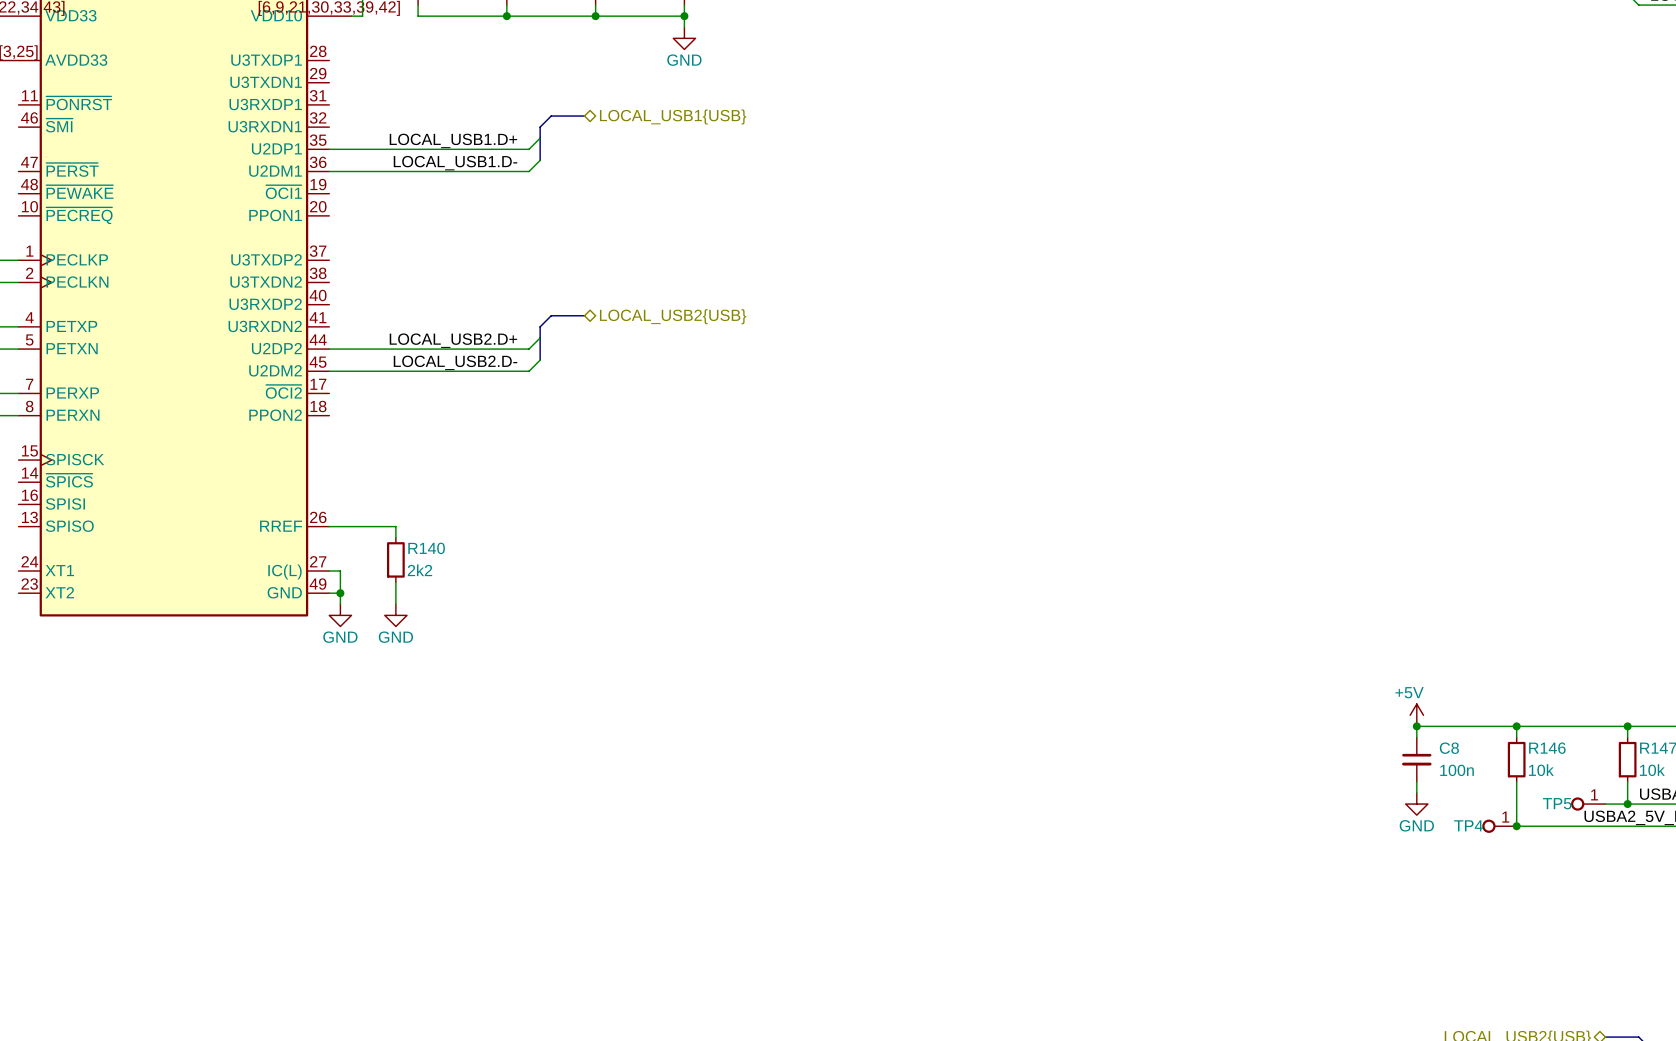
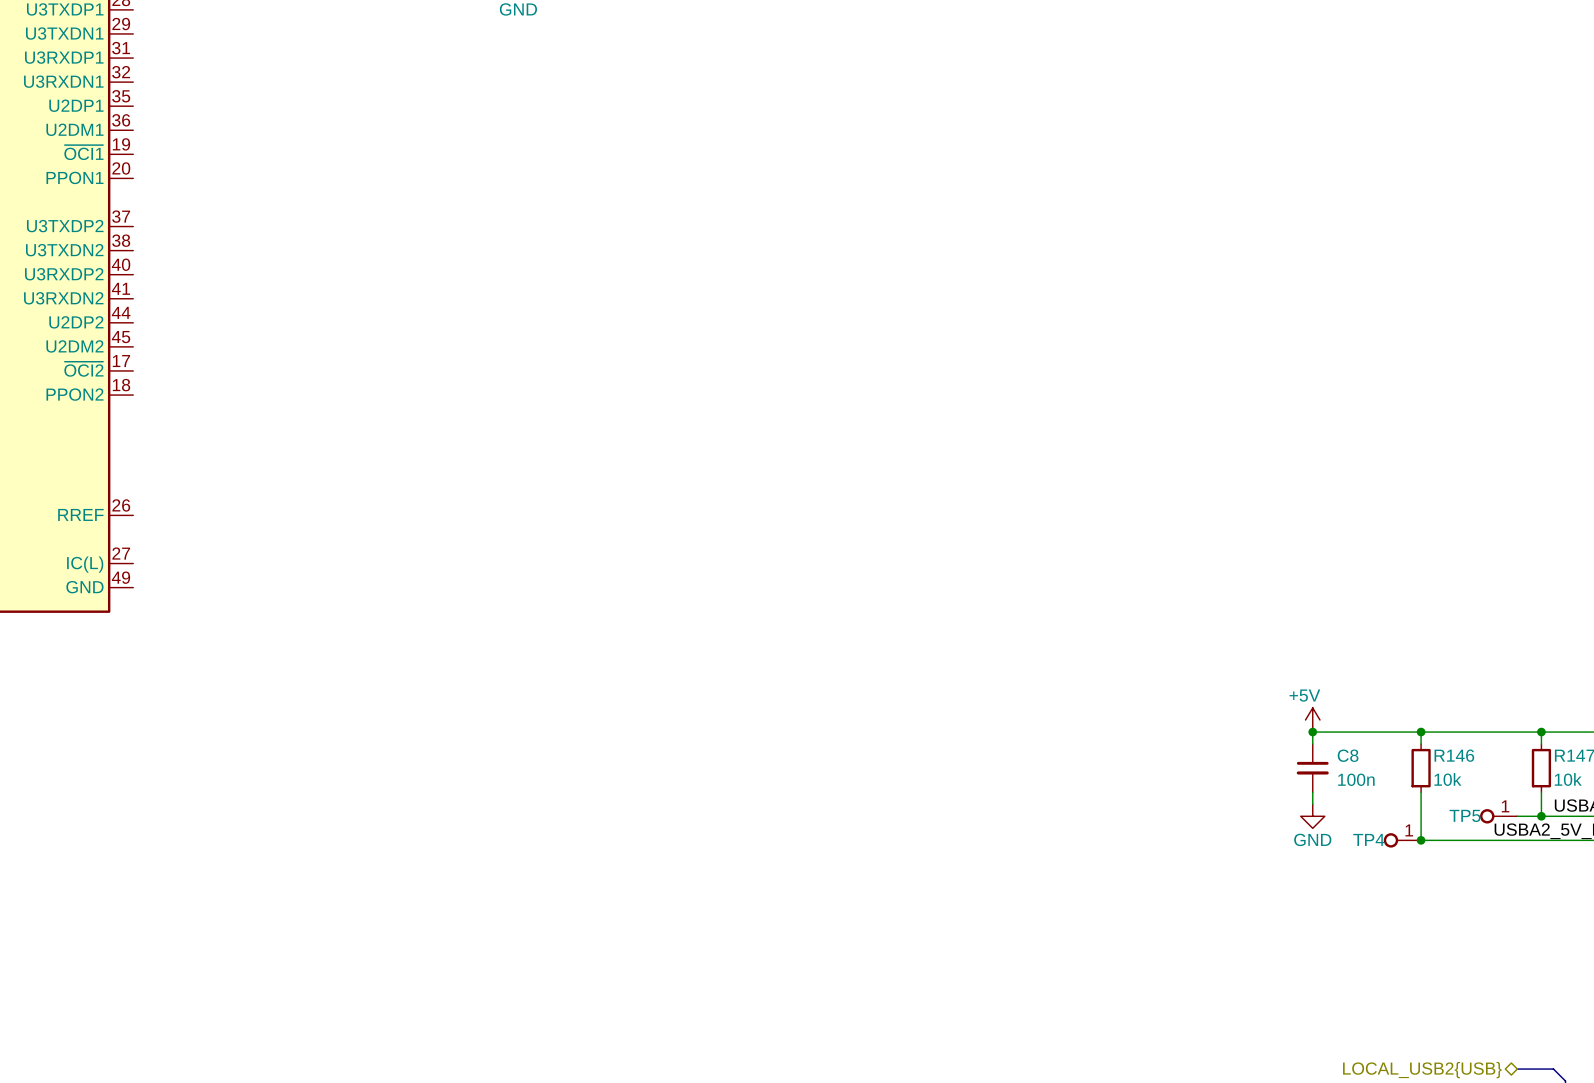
bus: (584, 116) (551, 116) (540, 127) (540, 160) -> none
hierarchical label: LOCAL_USB1{USB} (673, 116) -> none
wire: (540, 138) (529, 149) (329, 149) -> none
label: LOCAL_USB1.D+ (453, 140) -> none
wire: (540, 160) (529, 171) (329, 171) -> none
label: LOCAL_USB1.D- (455, 163) -> none
bus: (584, 315) (551, 315) (540, 326) (540, 360) -> none
hierarchical label: LOCAL_USB2{USB} (673, 316) -> none
wire: (540, 337) (529, 349) (329, 349) -> none
label: LOCAL_USB2.D+ (453, 340) -> none
wire: (540, 360) (529, 371) (329, 371) -> none
label: LOCAL_USB2.D- (455, 362) -> none
wire: (329, 526) (395, 526) (395, 537) -> none
R140: (395, 559) -> none
wire: (329, 571) (340, 571) (340, 604) -> none
wire: (395, 582) (395, 604) -> none
wire: (329, 593) (340, 593) -> none
junction: (340, 593) -> none
power symbol: GND (340, 615) -> none
power symbol: GND (395, 615) -> none

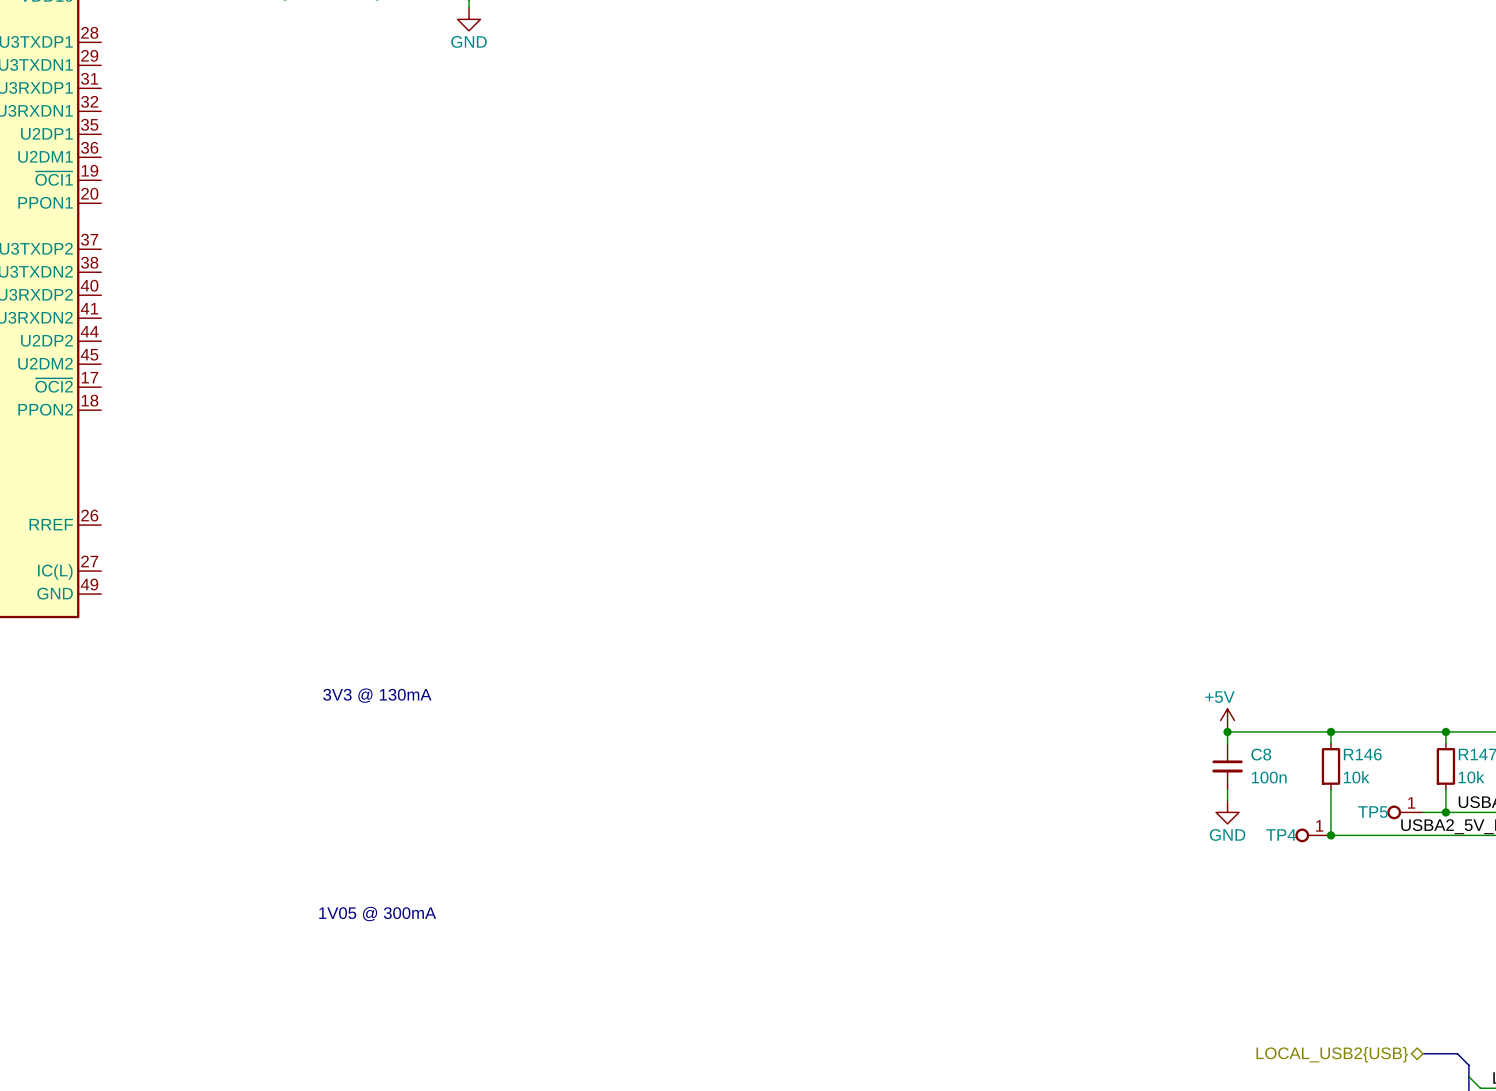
text: none -> 3V3 @ 130mA (377, 695)
text: none -> 1V05 @ 300mA (377, 914)

